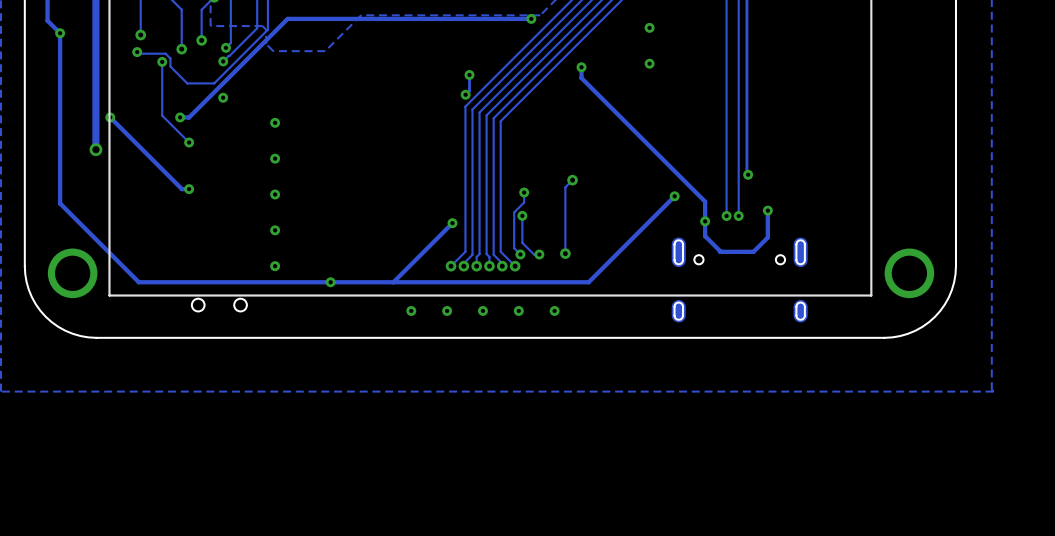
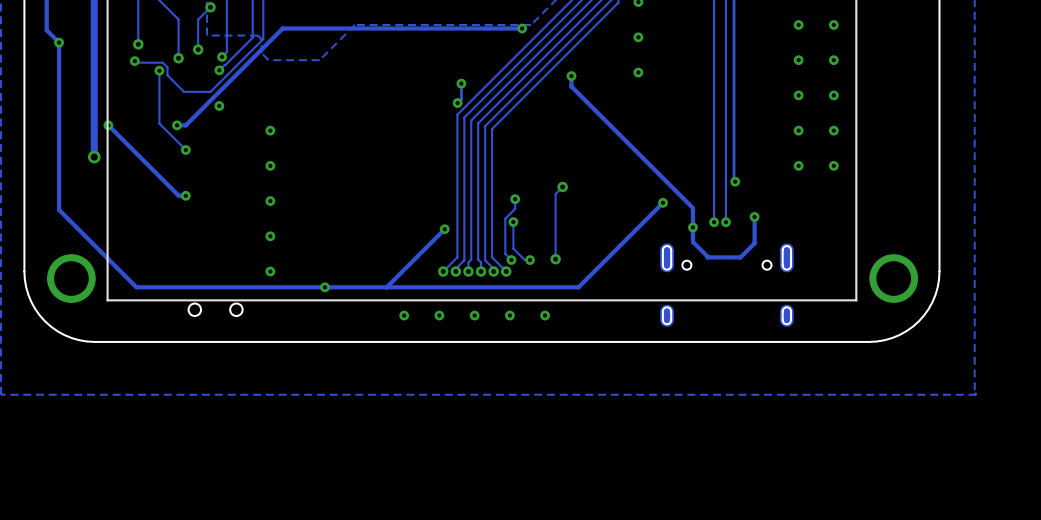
via: none -> (798, 24)
via: none -> (833, 24)
via: none -> (798, 60)
via: none -> (833, 60)
via: none -> (798, 95)
via: none -> (833, 95)
via: none -> (798, 130)
via: none -> (833, 130)
via: none -> (798, 165)
via: none -> (833, 165)

